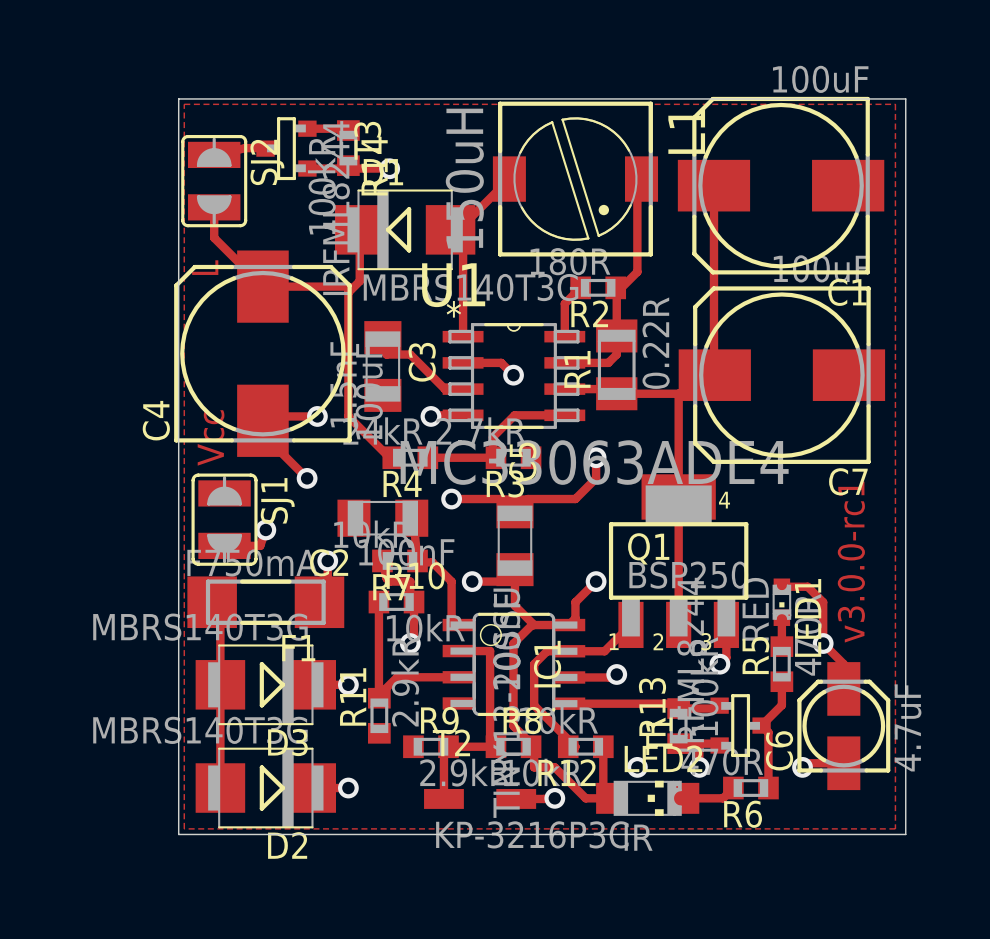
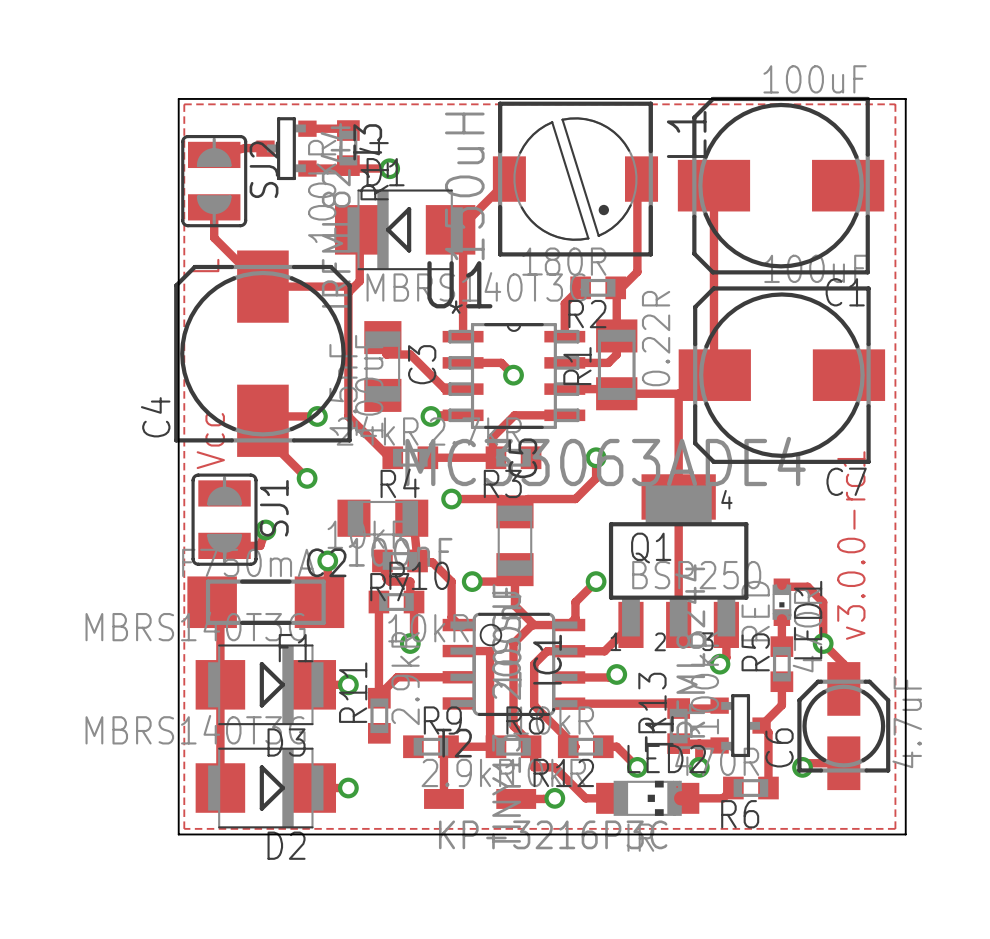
track: (603, 746) (603, 798) -> (603, 746) (616, 746) (637, 767)

